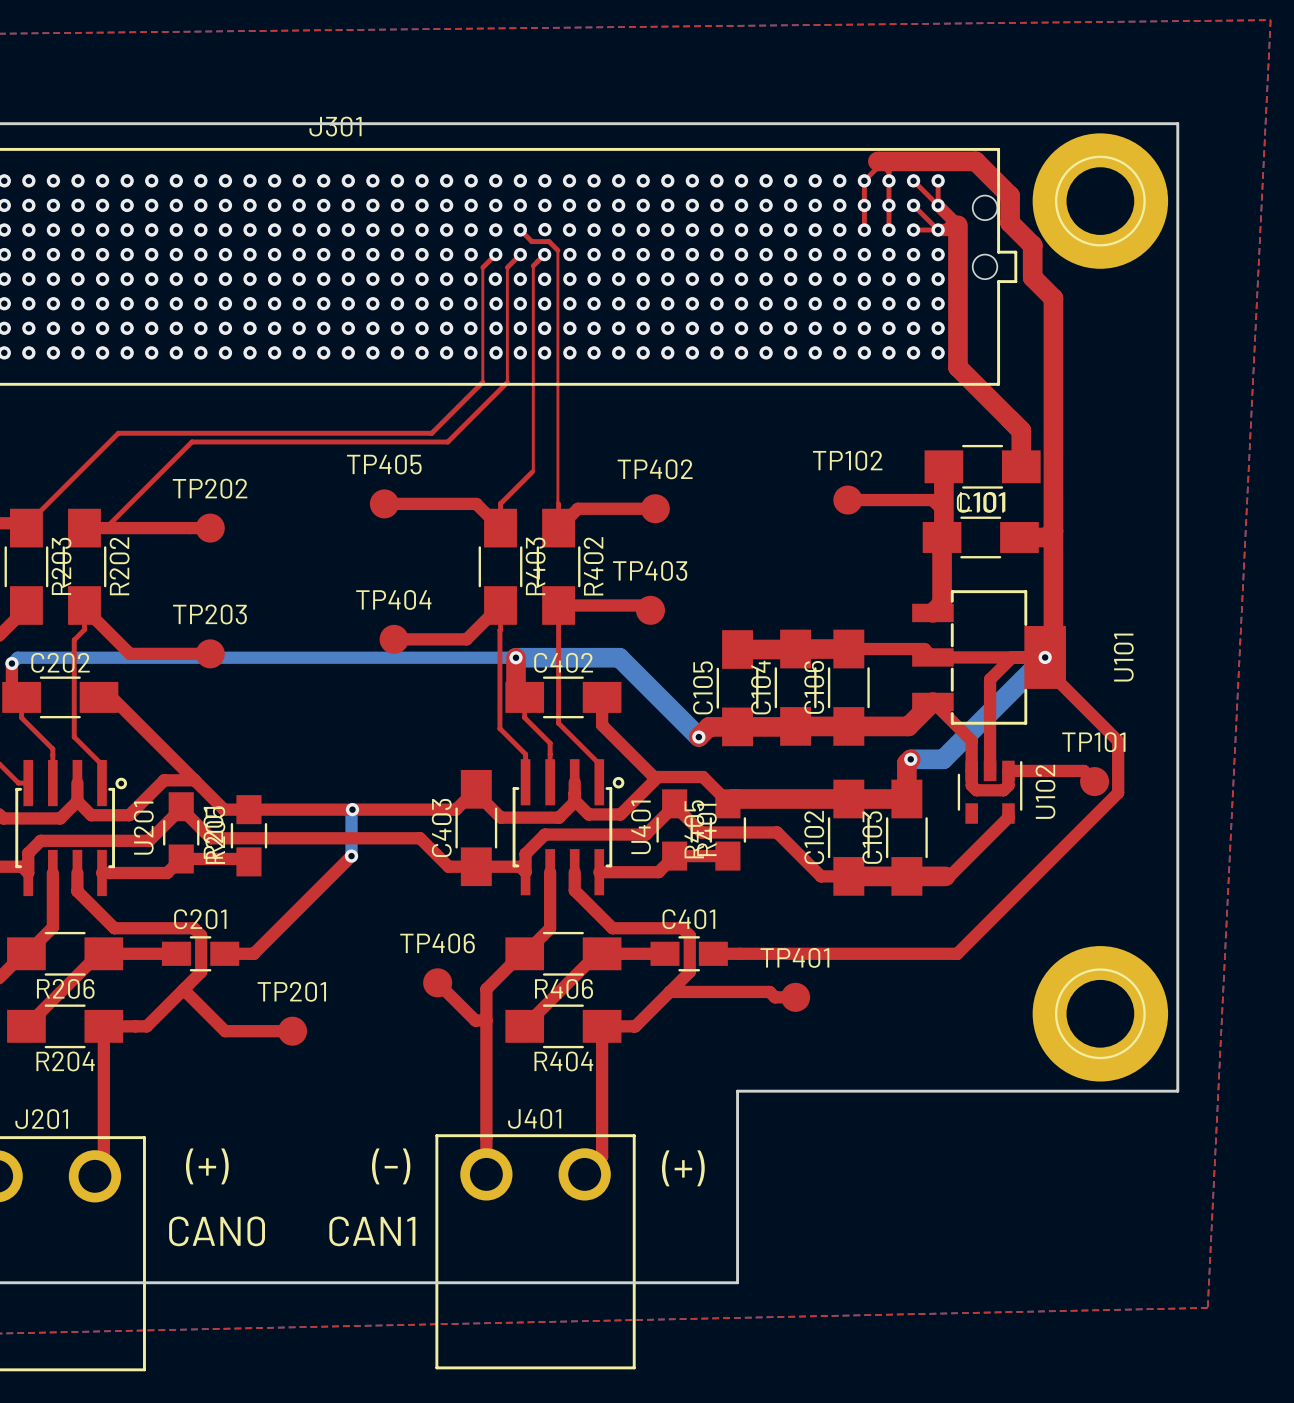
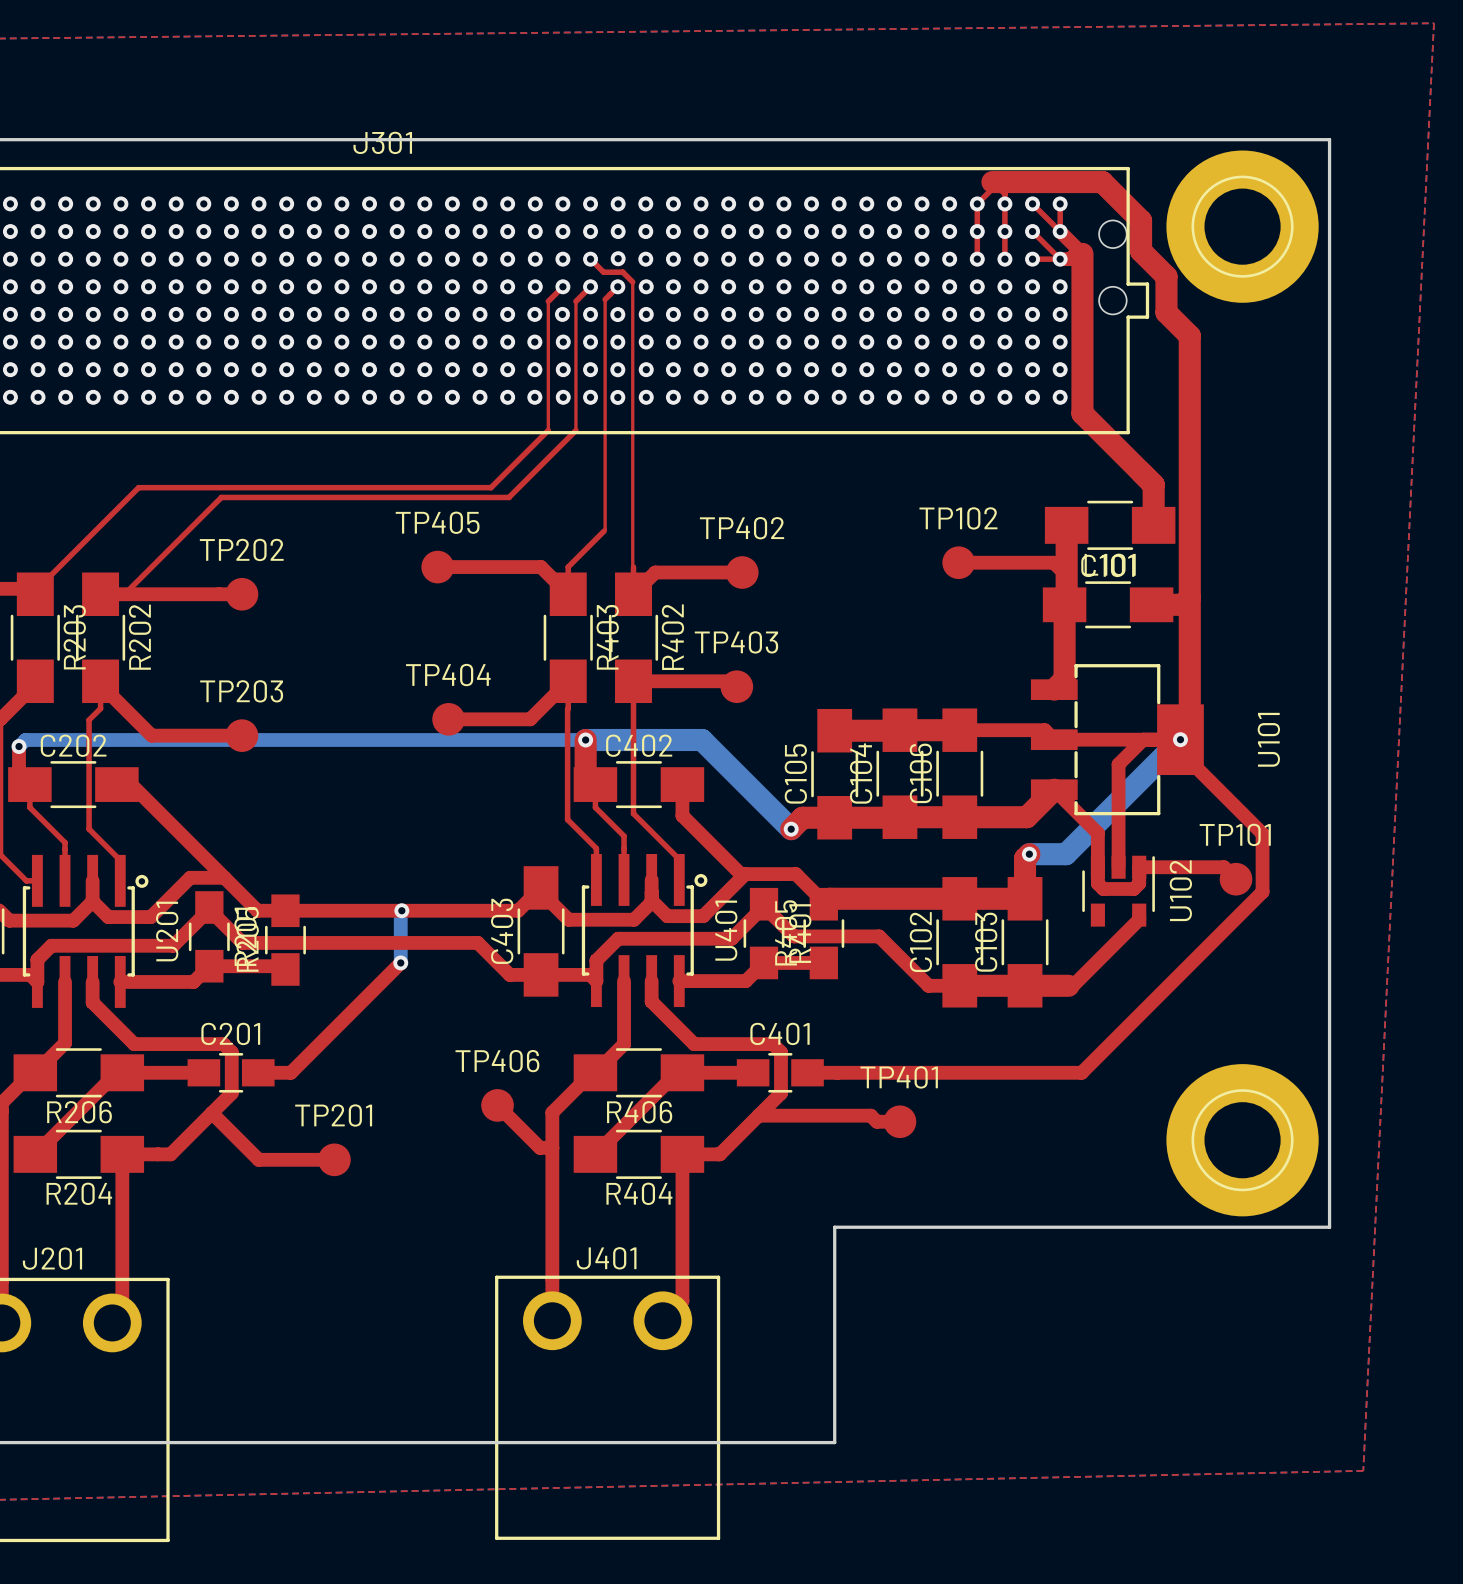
text: (+) (207, 1166) -> none
text: (-) (391, 1166) -> none
text: (+) (683, 1168) -> none
text: CAN0 (217, 1231) -> none
text: CAN1 (372, 1231) -> none

